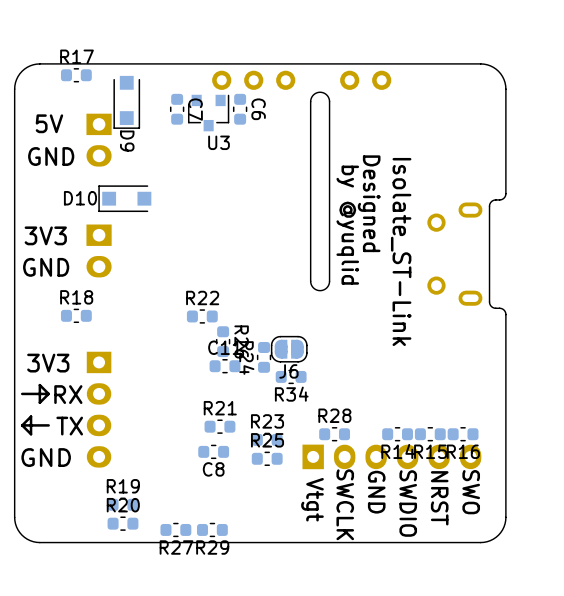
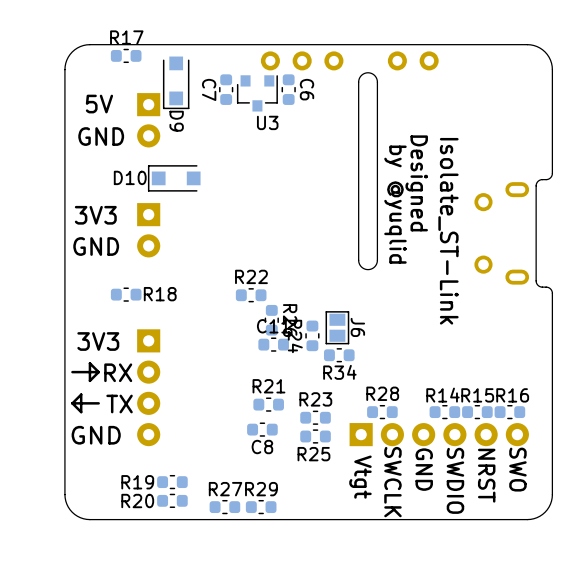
C7 name position: C7 (195, 109) -> C7 (209, 89)
part footprint: [86, 113, 112, 167] -> [137, 93, 161, 148]
part footprint: [86, 224, 112, 278] -> [137, 203, 161, 258]
R18 name position: R18 (76, 297) -> R18 (160, 294)
J6 footprint: [270, 335, 308, 363] -> [325, 311, 350, 345]
part footprint: [86, 351, 112, 468] -> [137, 329, 161, 447]
J6 name rotation: 0° (288, 371) -> 90° clockwise (357, 327)
J6 name position: J6 (288, 371) -> J6 (357, 327)
R25 name position: R25 (267, 440) -> R25 (313, 454)
part footprint: [302, 444, 482, 470] -> [349, 423, 529, 447]
R14 name position: R14 (398, 451) -> R14 (442, 395)
R15 name position: R15 (430, 451) -> R15 (477, 395)
R16 name position: R16 (463, 451) -> R16 (512, 395)
R19 name position: R19 (123, 486) -> R19 (137, 482)
R20 name position: R20 (123, 505) -> R20 (137, 501)
R27 name position: R27 (176, 547) -> R27 (225, 489)
R29 name position: R29 (212, 547) -> R29 (261, 489)

